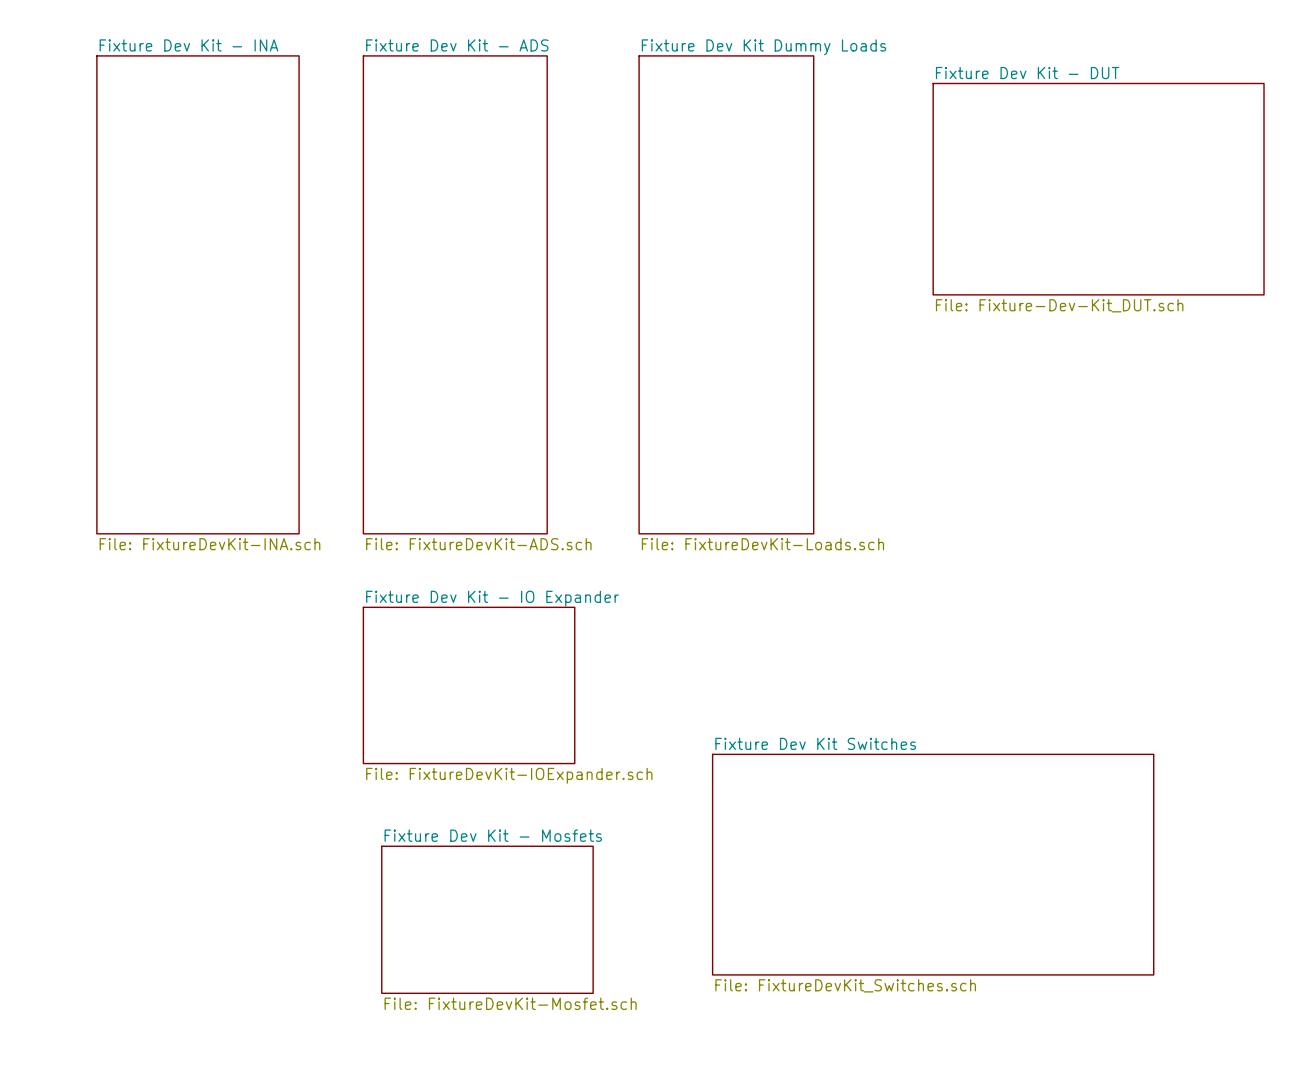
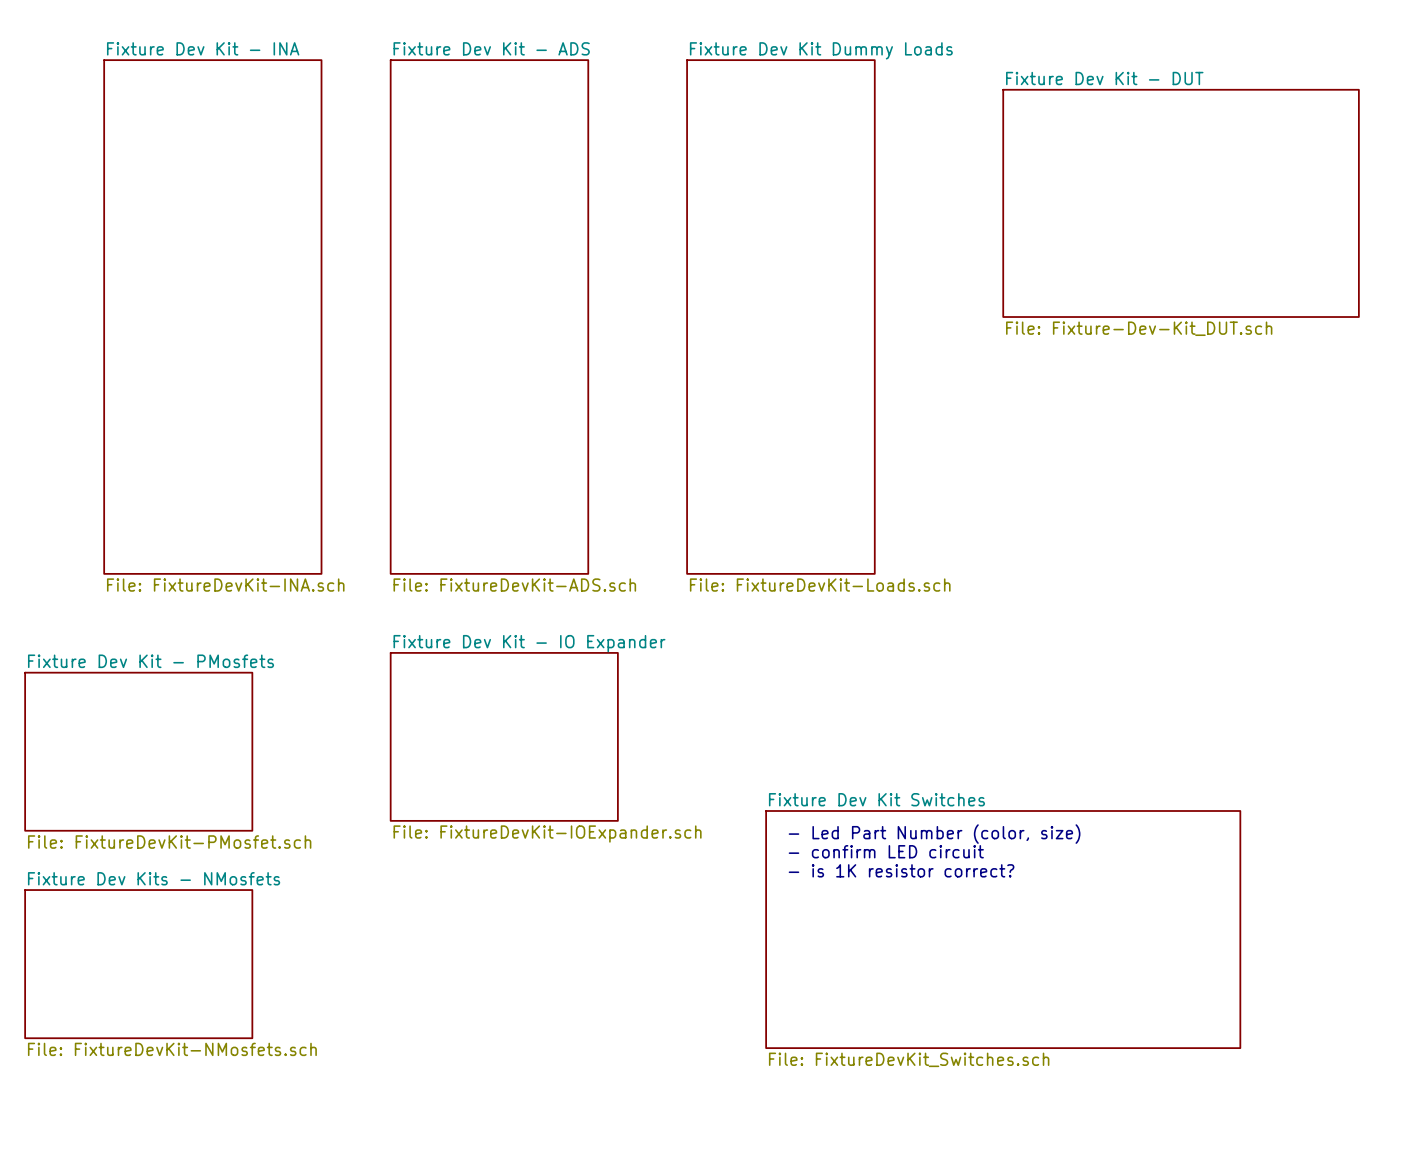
sheet Fixture Dev Kit - PMosfets: none -> File: FixtureDevKit-PMosfet.sch (138, 751)
text: none -> - Led Part Number (color, size) (934, 834)
text: none -> - confirm LED circuit (886, 851)
text: none -> - is 1K resistor correct? (901, 870)
sheet Fixture Dev Kits - NMosfets: none -> File: FixtureDevKit-NMosfets.sch (138, 964)
sheet Fixture Dev Kit - Mosfets: File: FixtureDevKit-Mosfet.sch (487, 919) -> none

